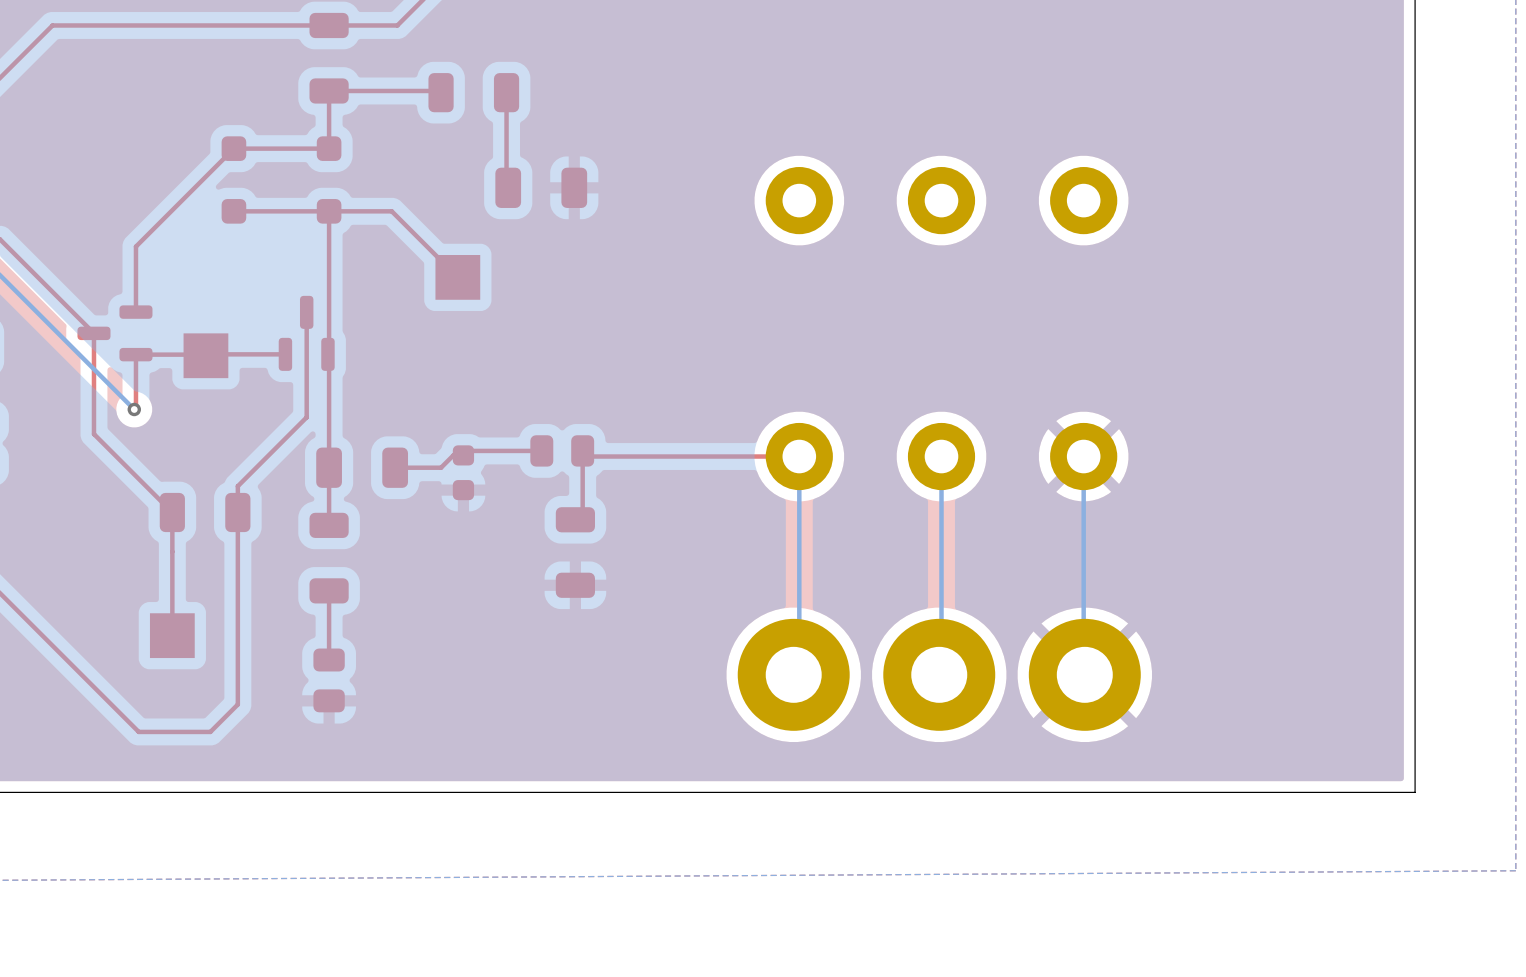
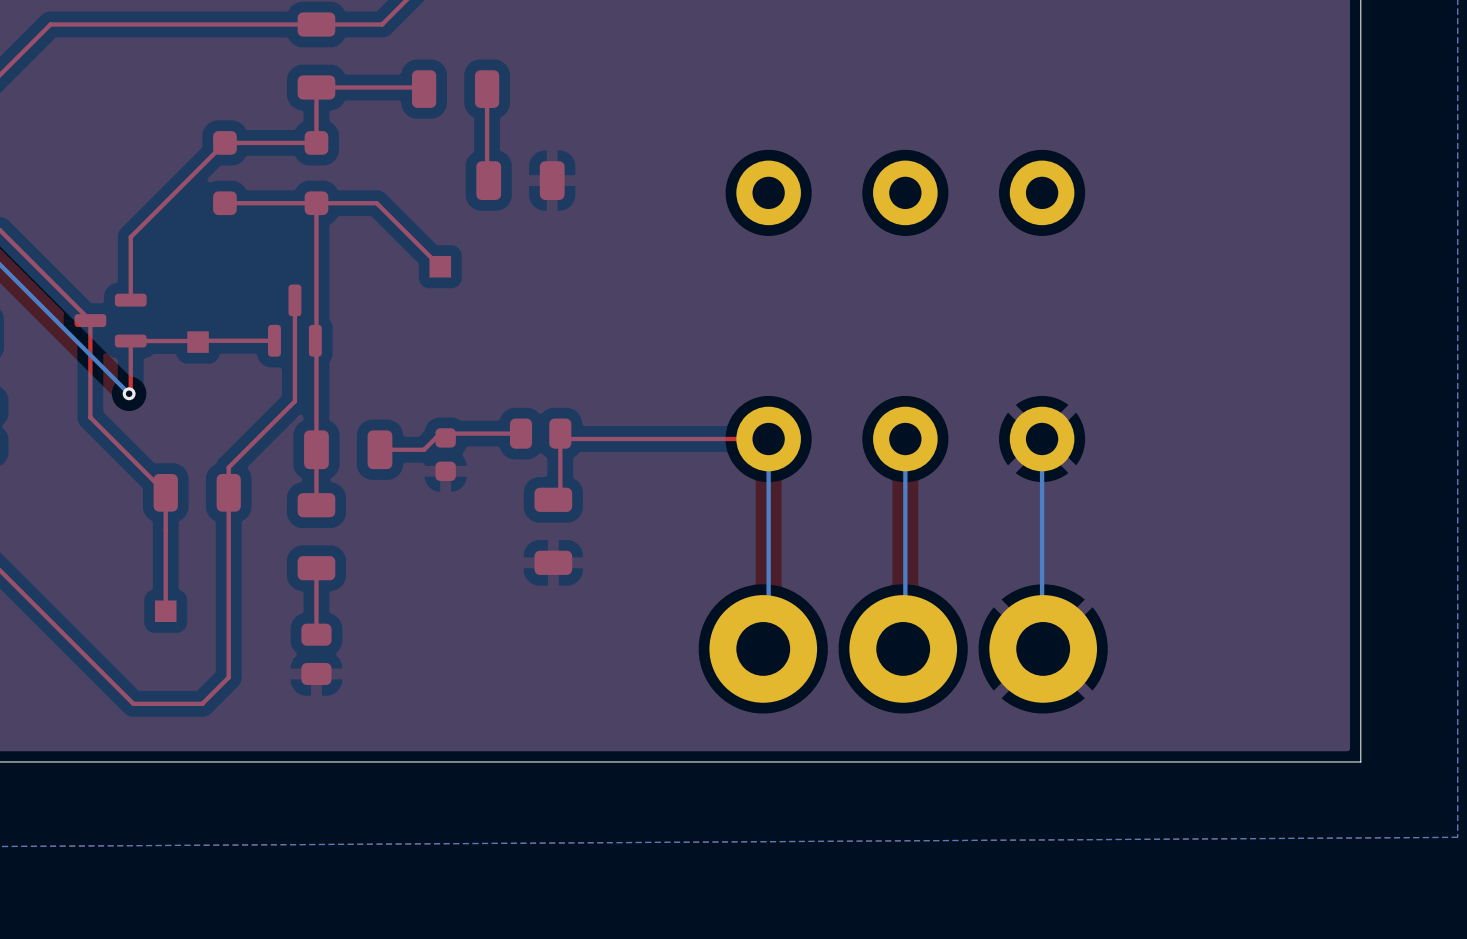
part footprint: [435, 254, 481, 300] -> [429, 255, 452, 278]
part footprint: [183, 333, 229, 379] -> [187, 331, 209, 353]
part footprint: [149, 613, 195, 659] -> [154, 600, 177, 623]

